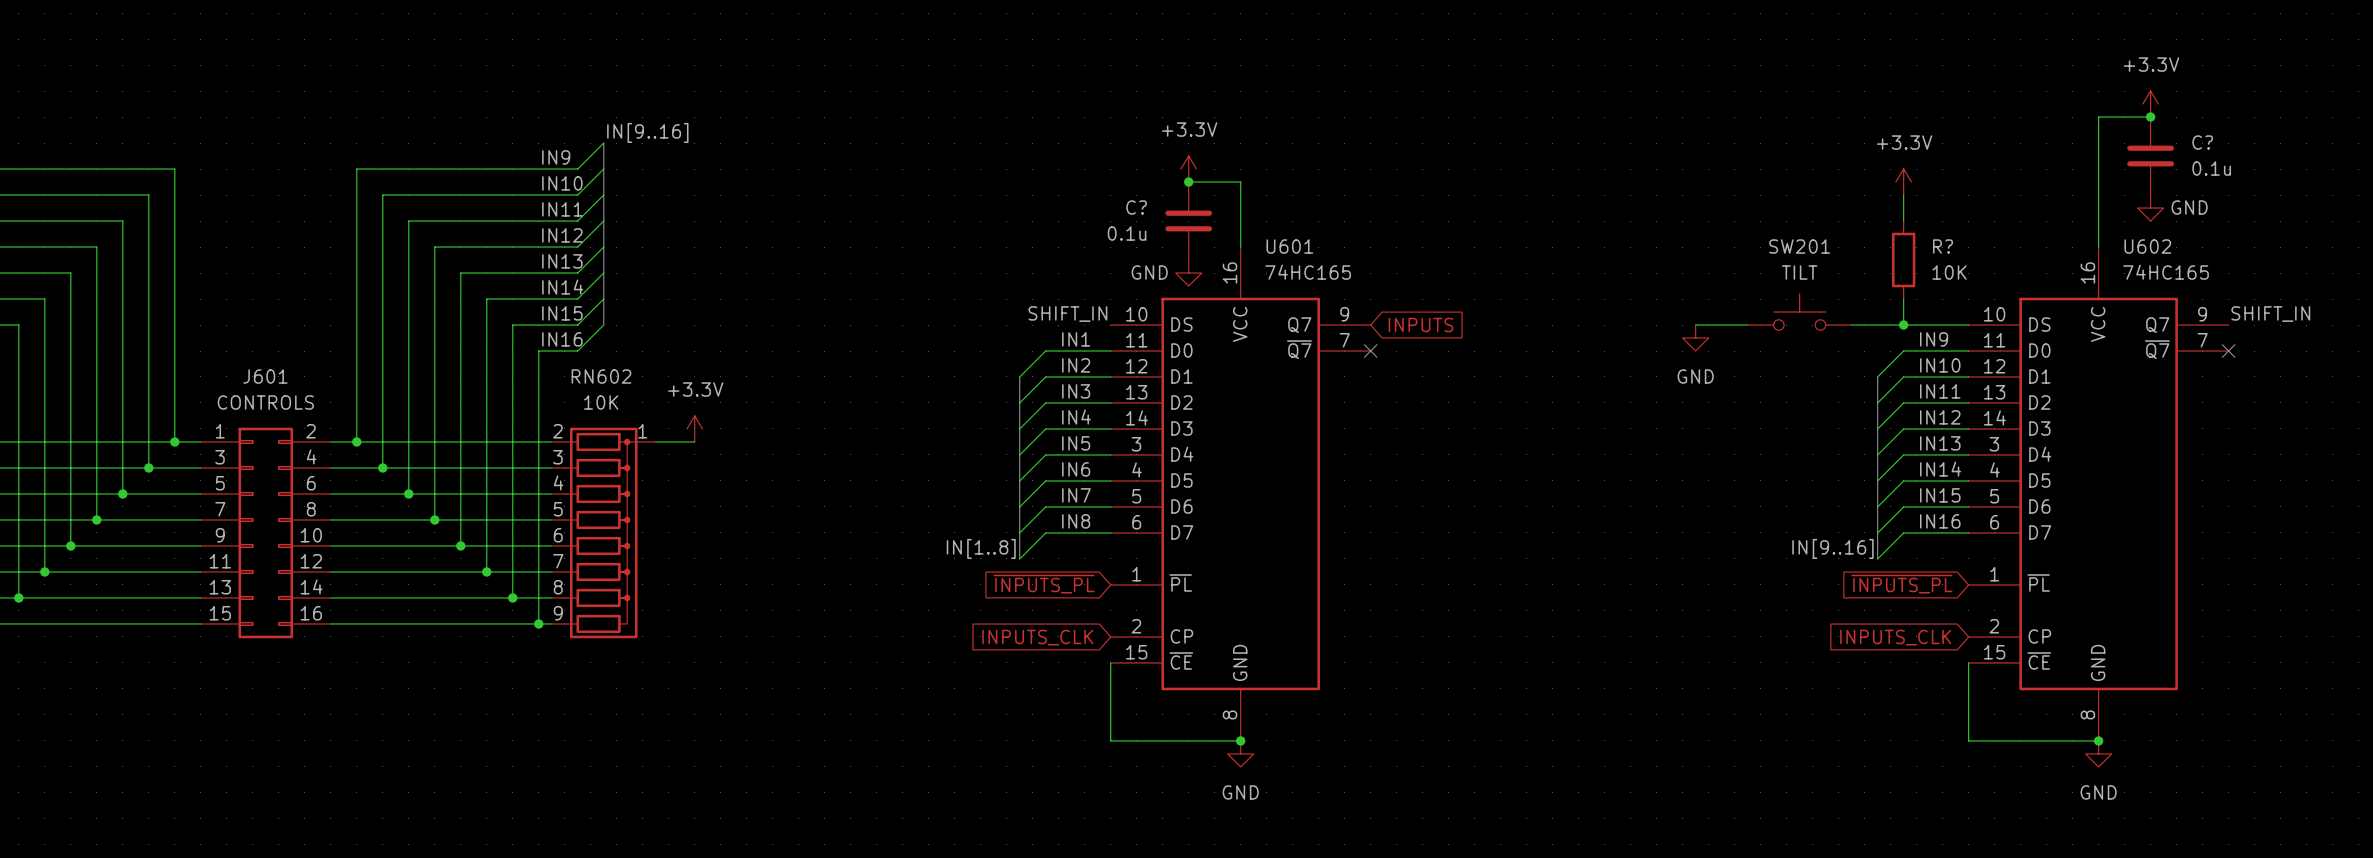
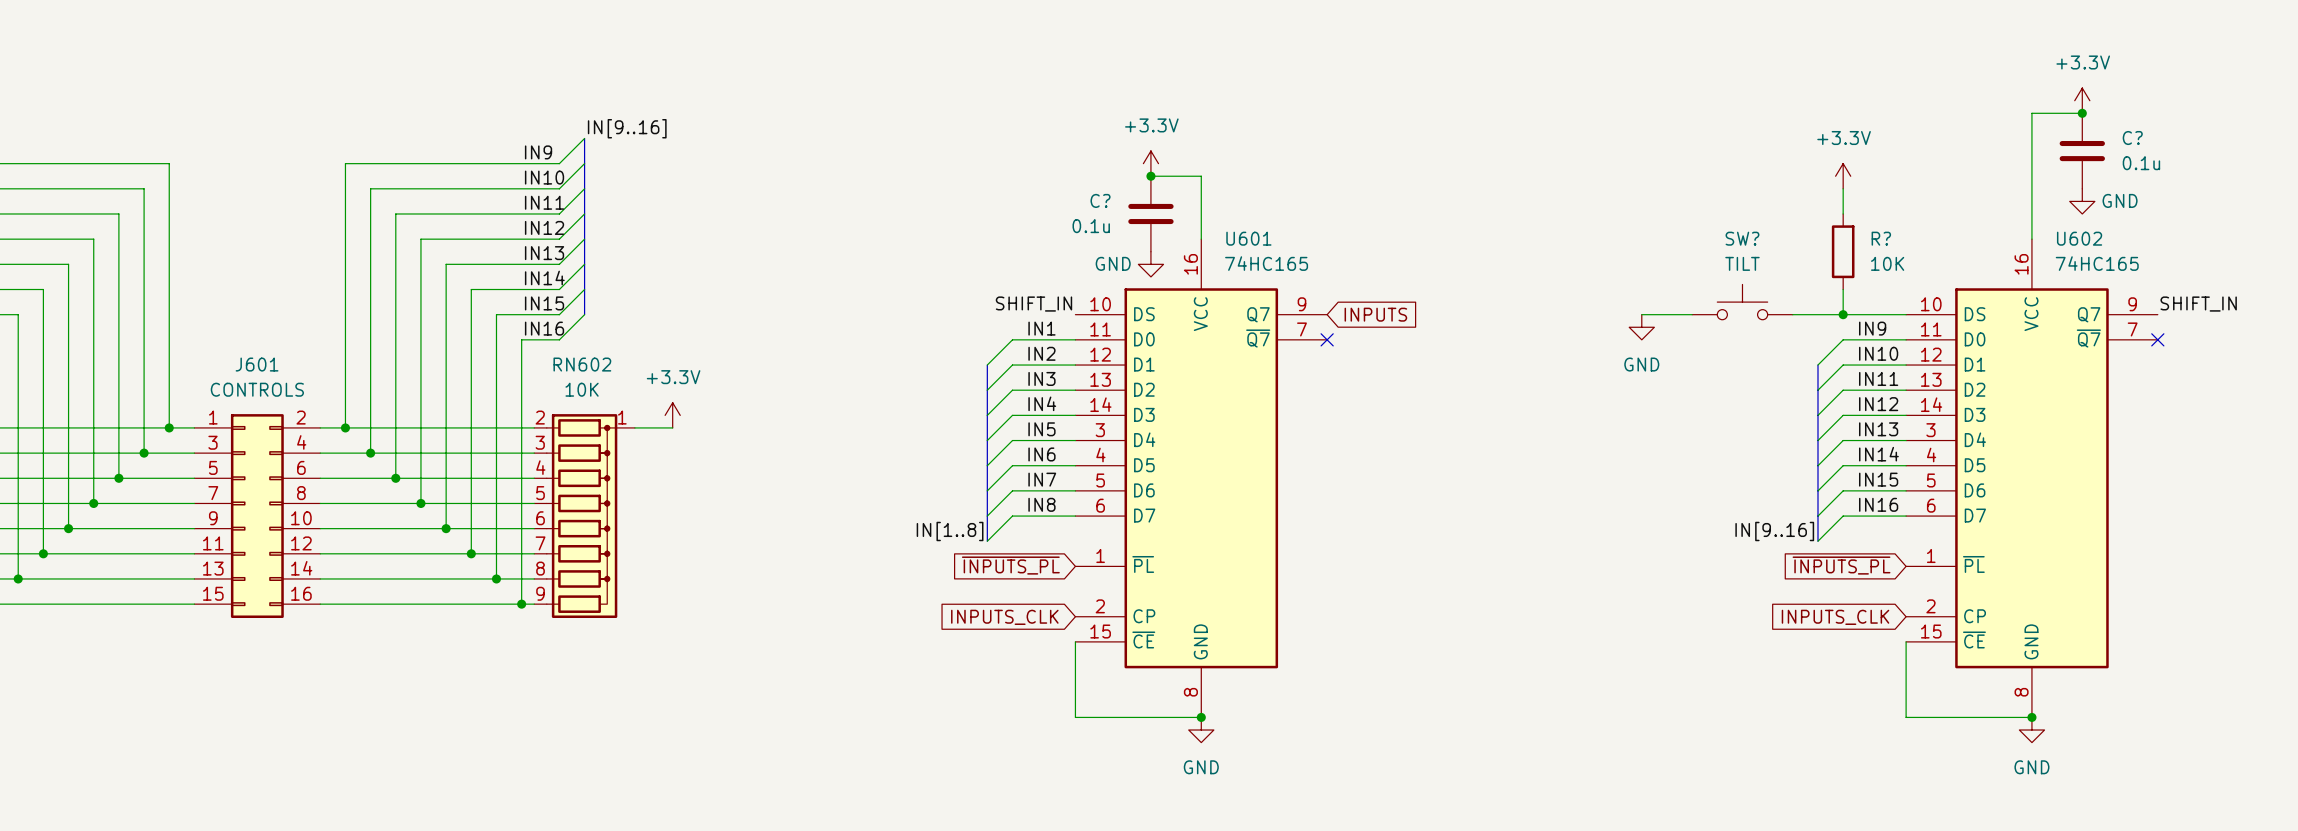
SW201 name: SW201 (1799, 246) -> SW? (1742, 238)

